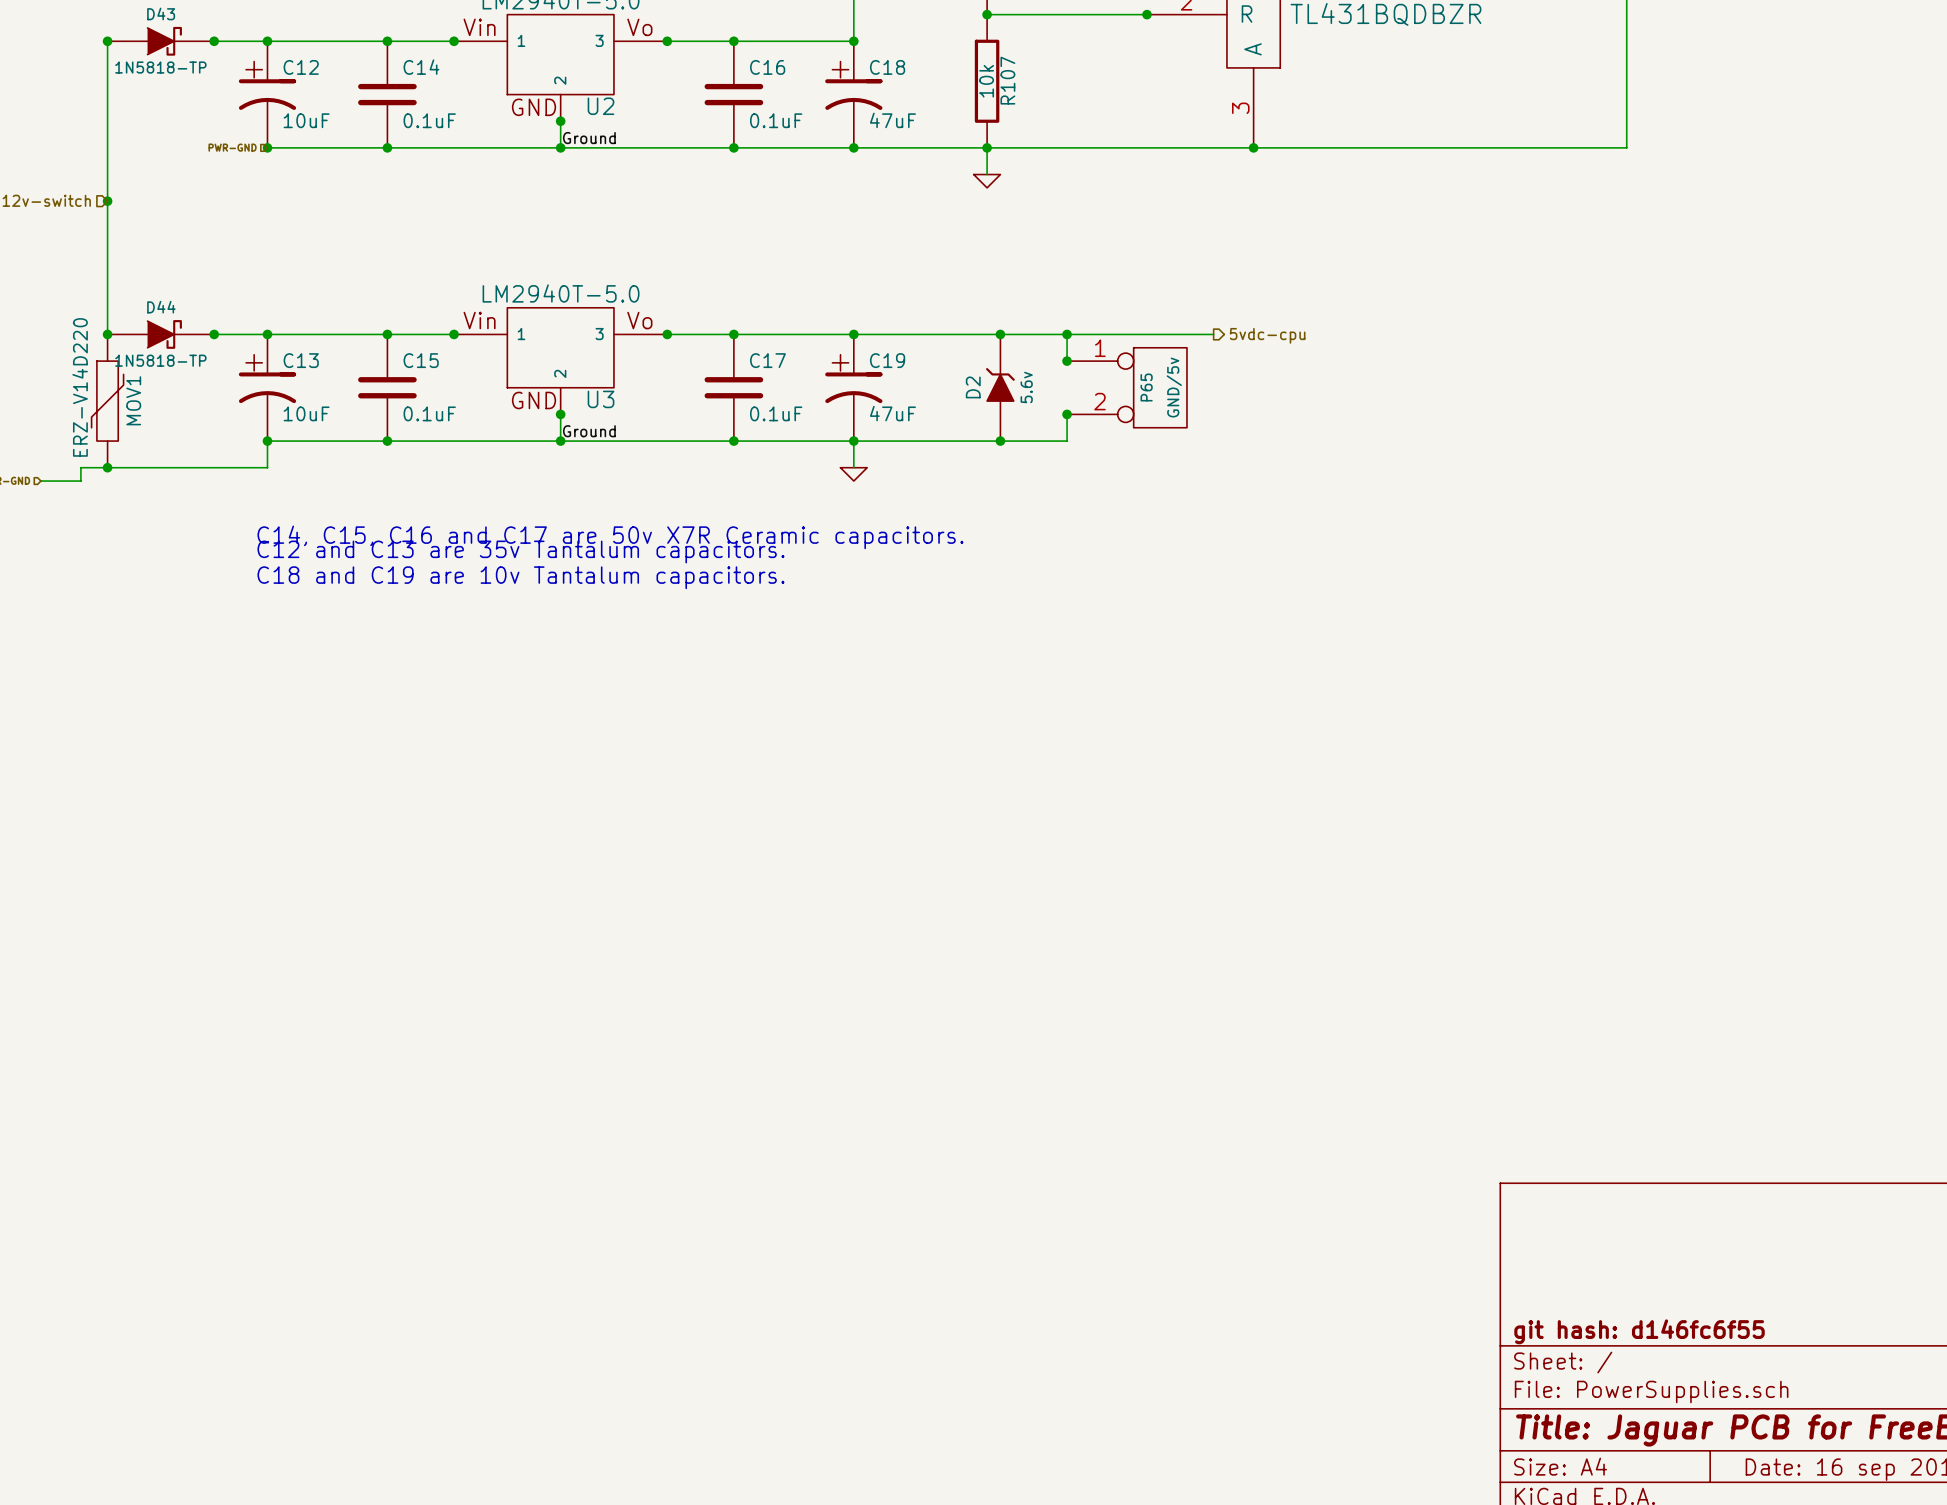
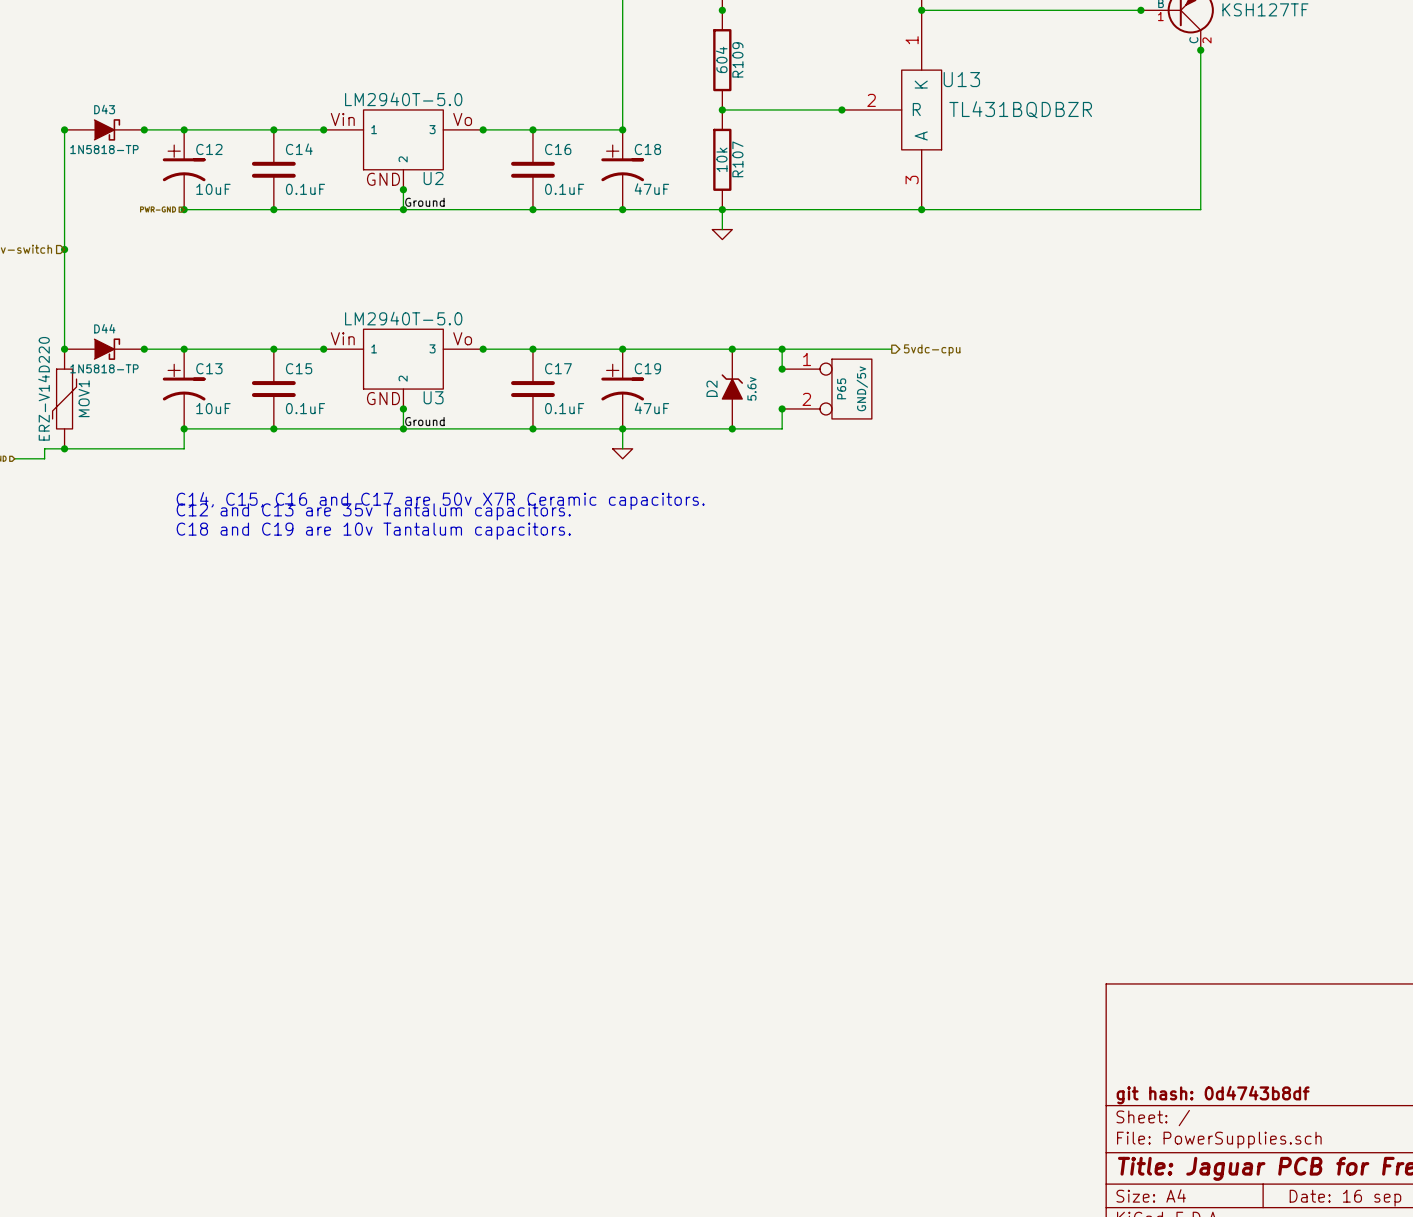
title block: git hash: d146fc6f55 (1639, 1331) -> git hash: 0d4743b8df (1213, 1095)

